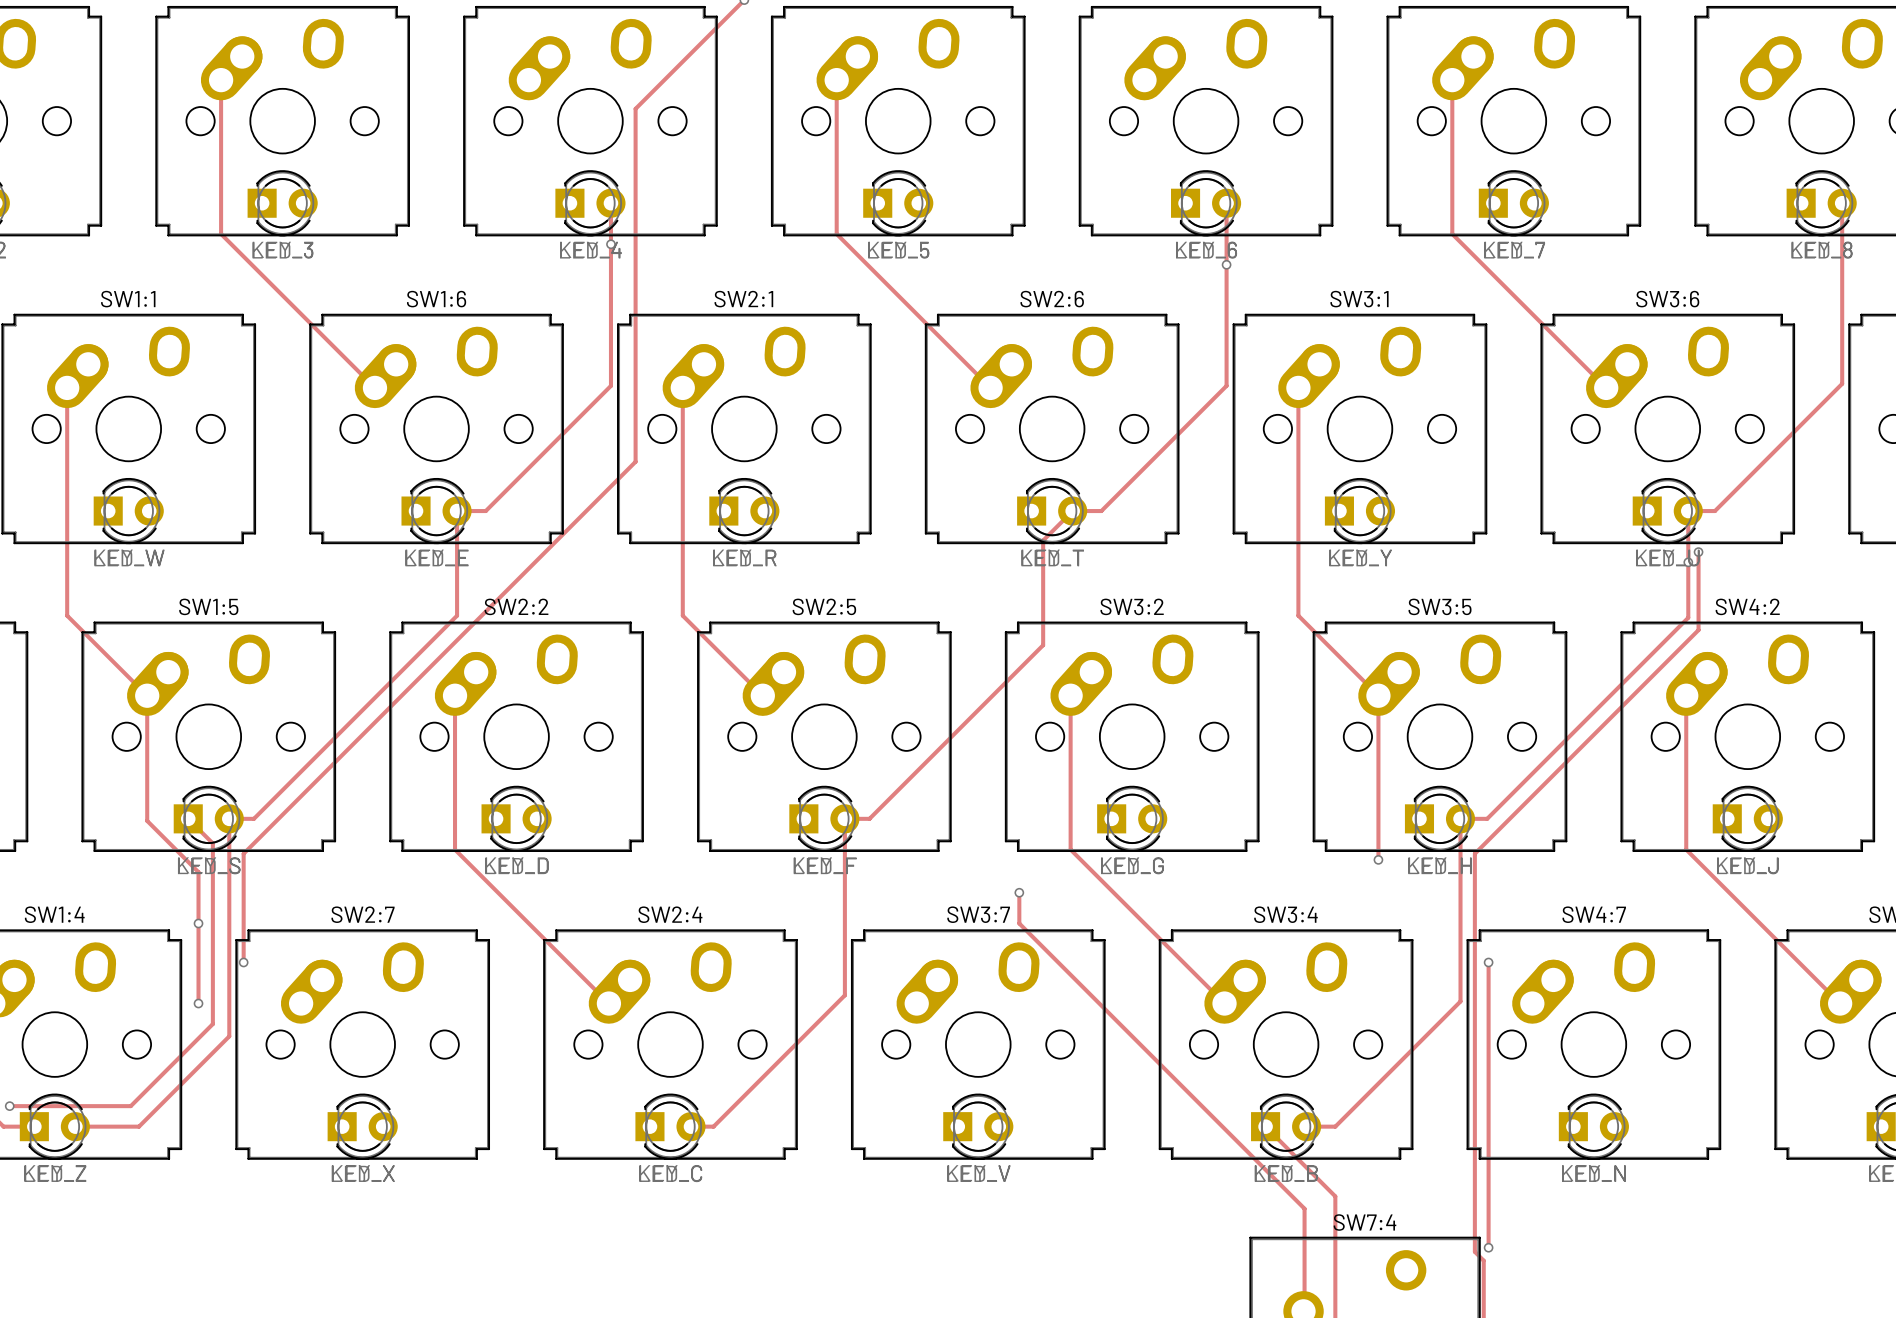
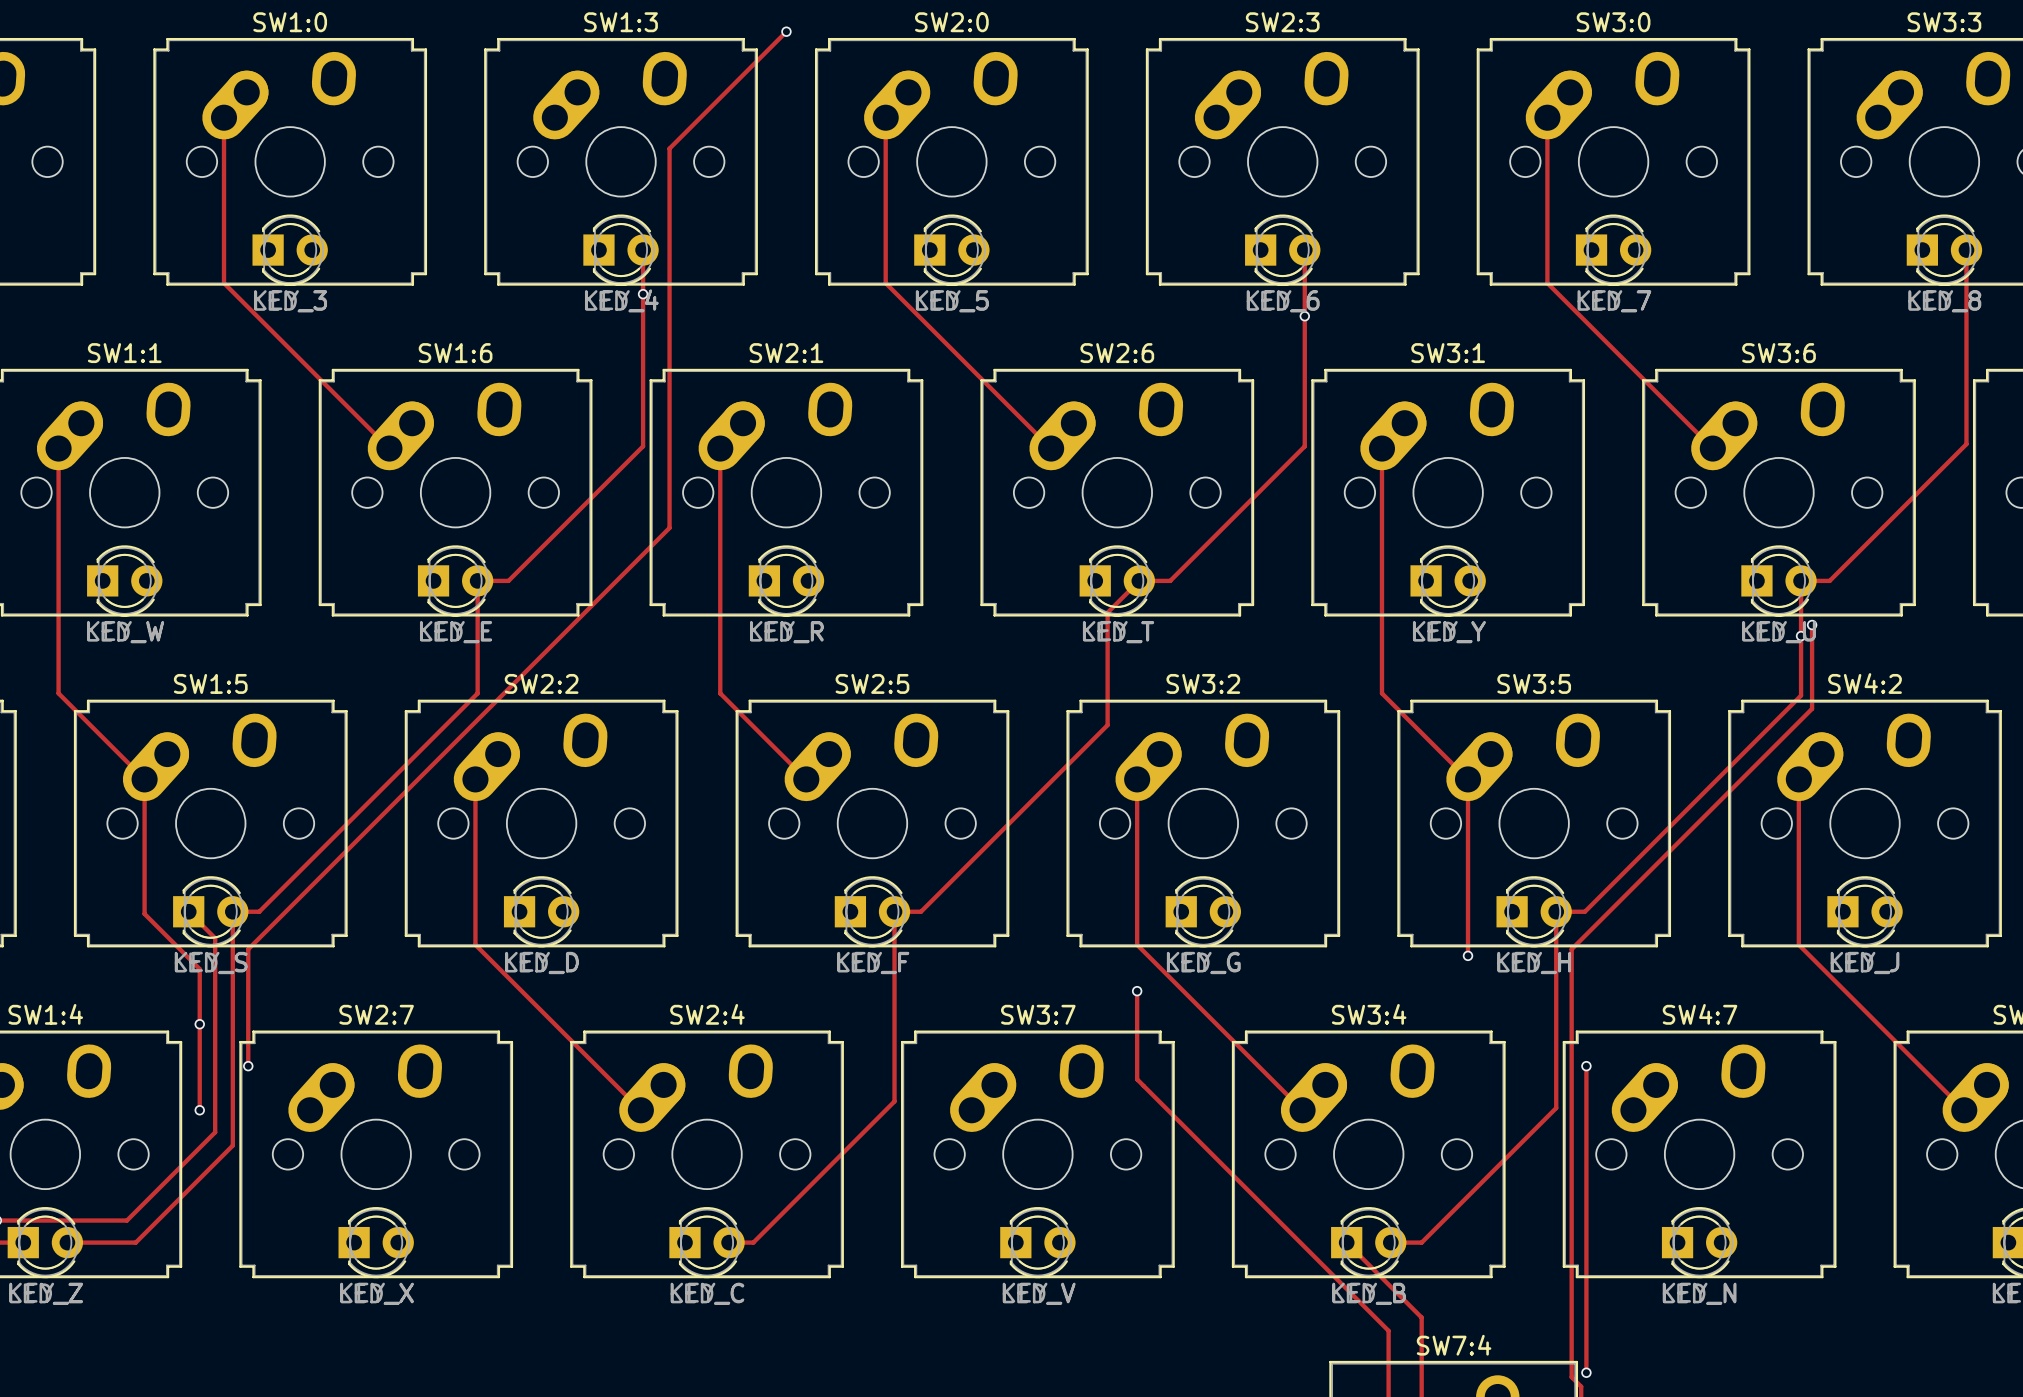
track: (1019, 892) (1019, 923) (1070, 974) -> (1137, 991) (1137, 1079)
via position: (1019, 892) -> (1137, 991)

